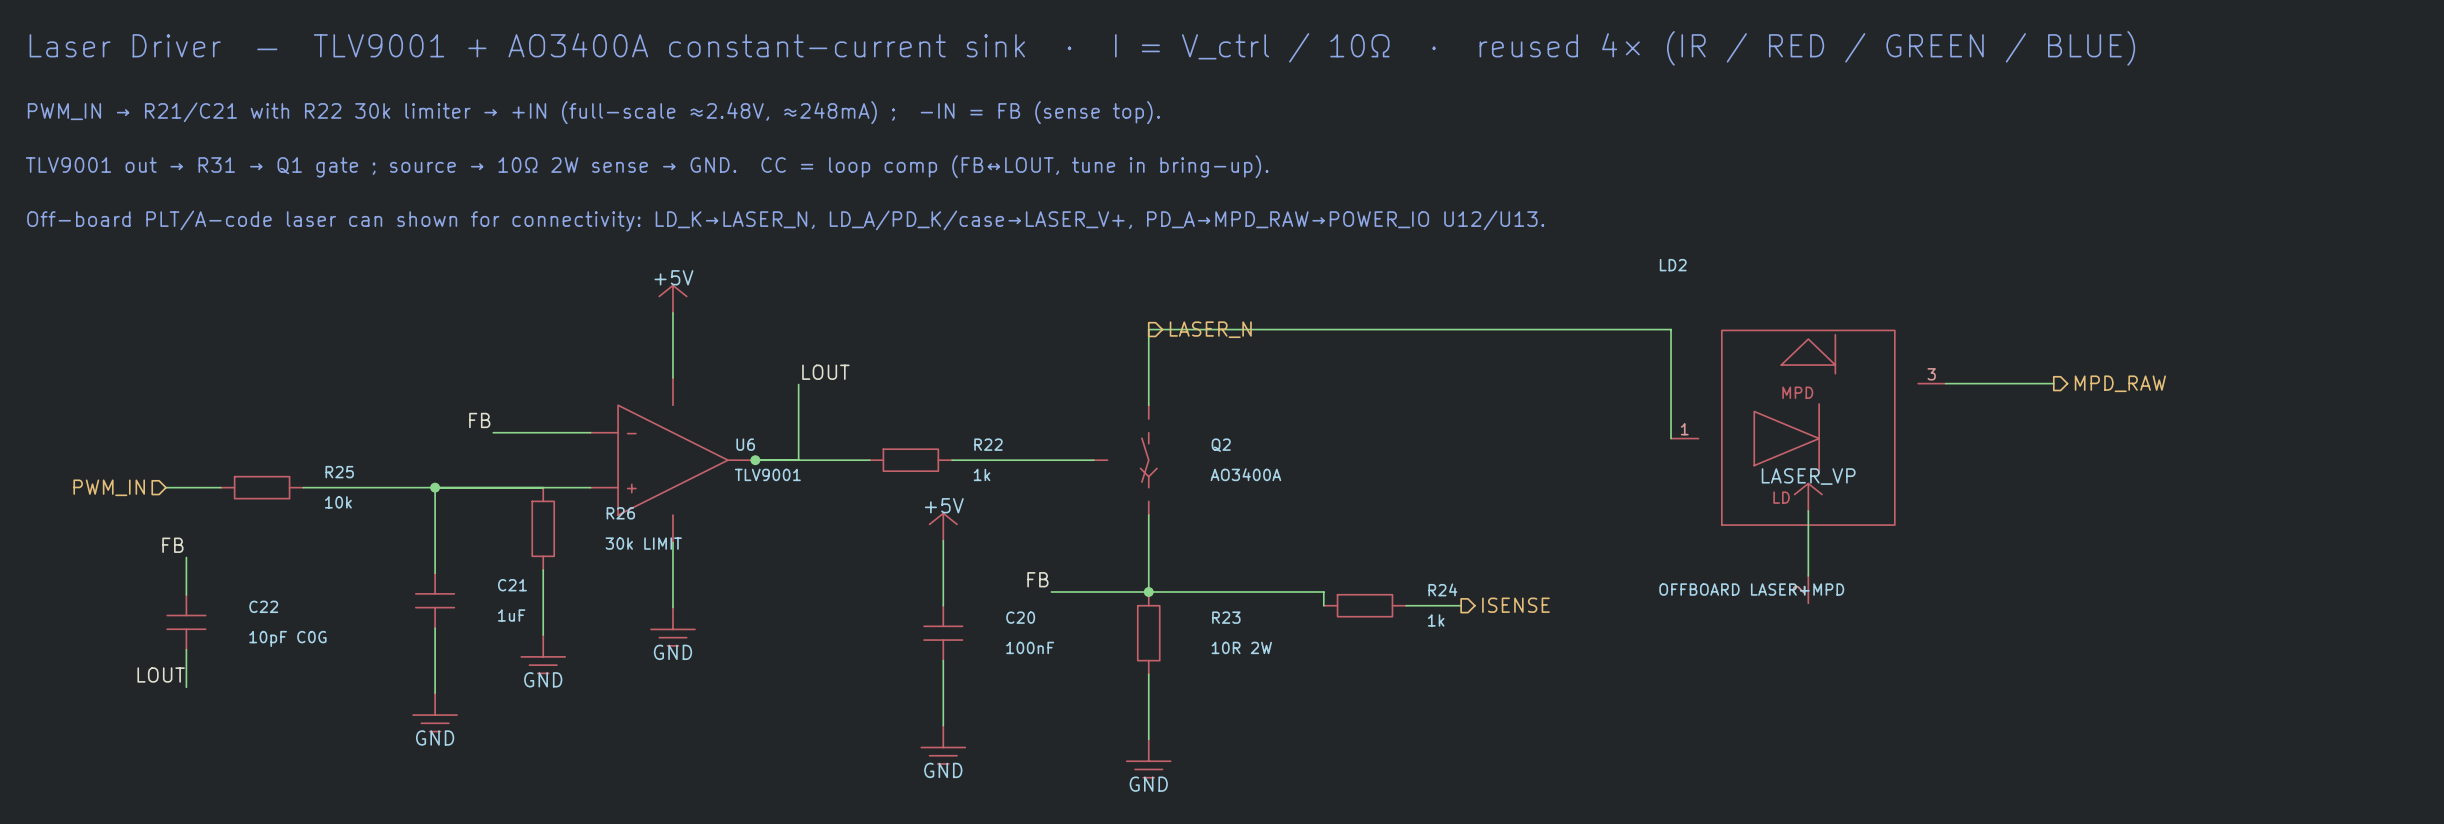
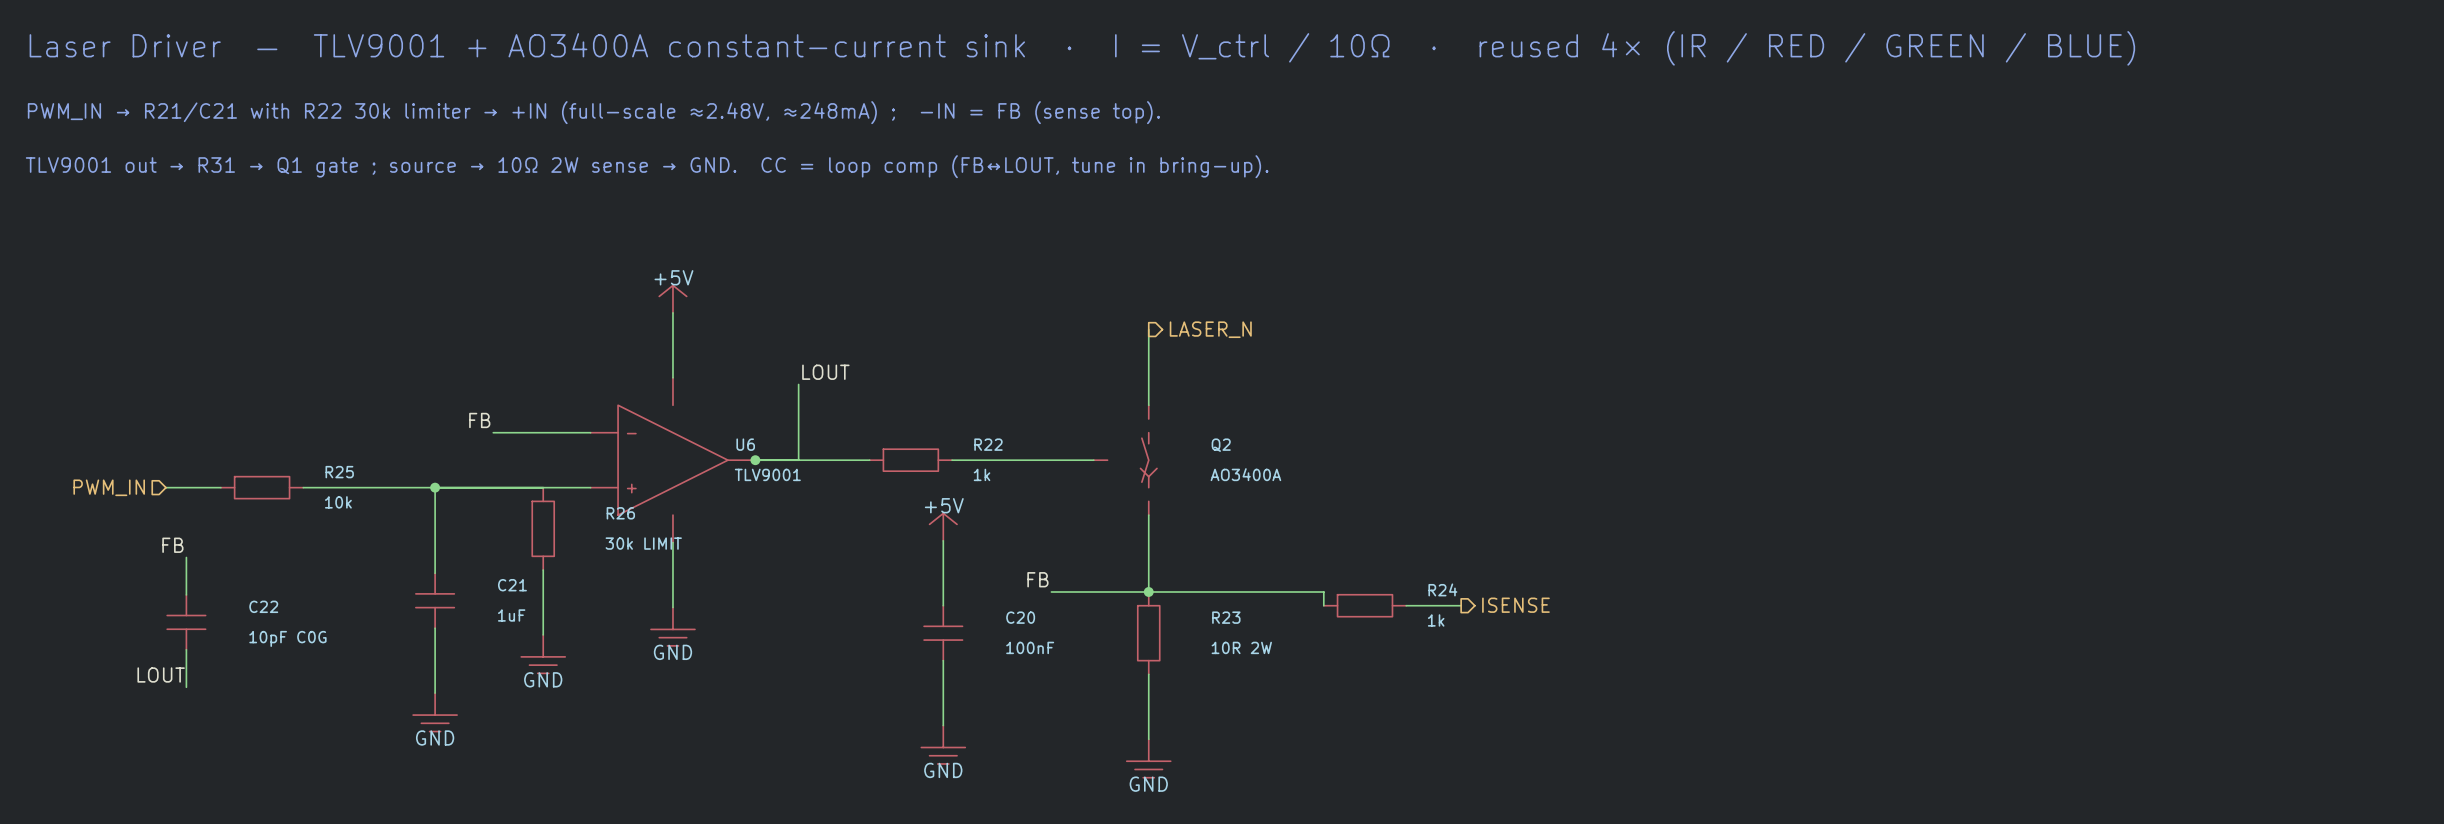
text: Off-board PLT/A-code laser can shown for connectivity: LD_K→LASER_N, LD_A/PD_K/case→LASER_V+, PD_A→MPD_RAW→POWER_IO U12/U13. (785, 221) -> none
wire: (1148, 329) (1671, 329) (1671, 438) -> none
wire: (1945, 383) (2053, 383) -> none
hierarchical label: MPD_RAW (2120, 383) -> none
LD2: OFFBOARD LASER+MPD (1808, 466) -> none
power symbol: LASER_VP (1808, 497) -> none
wire: (1808, 511) (1808, 575) -> none

